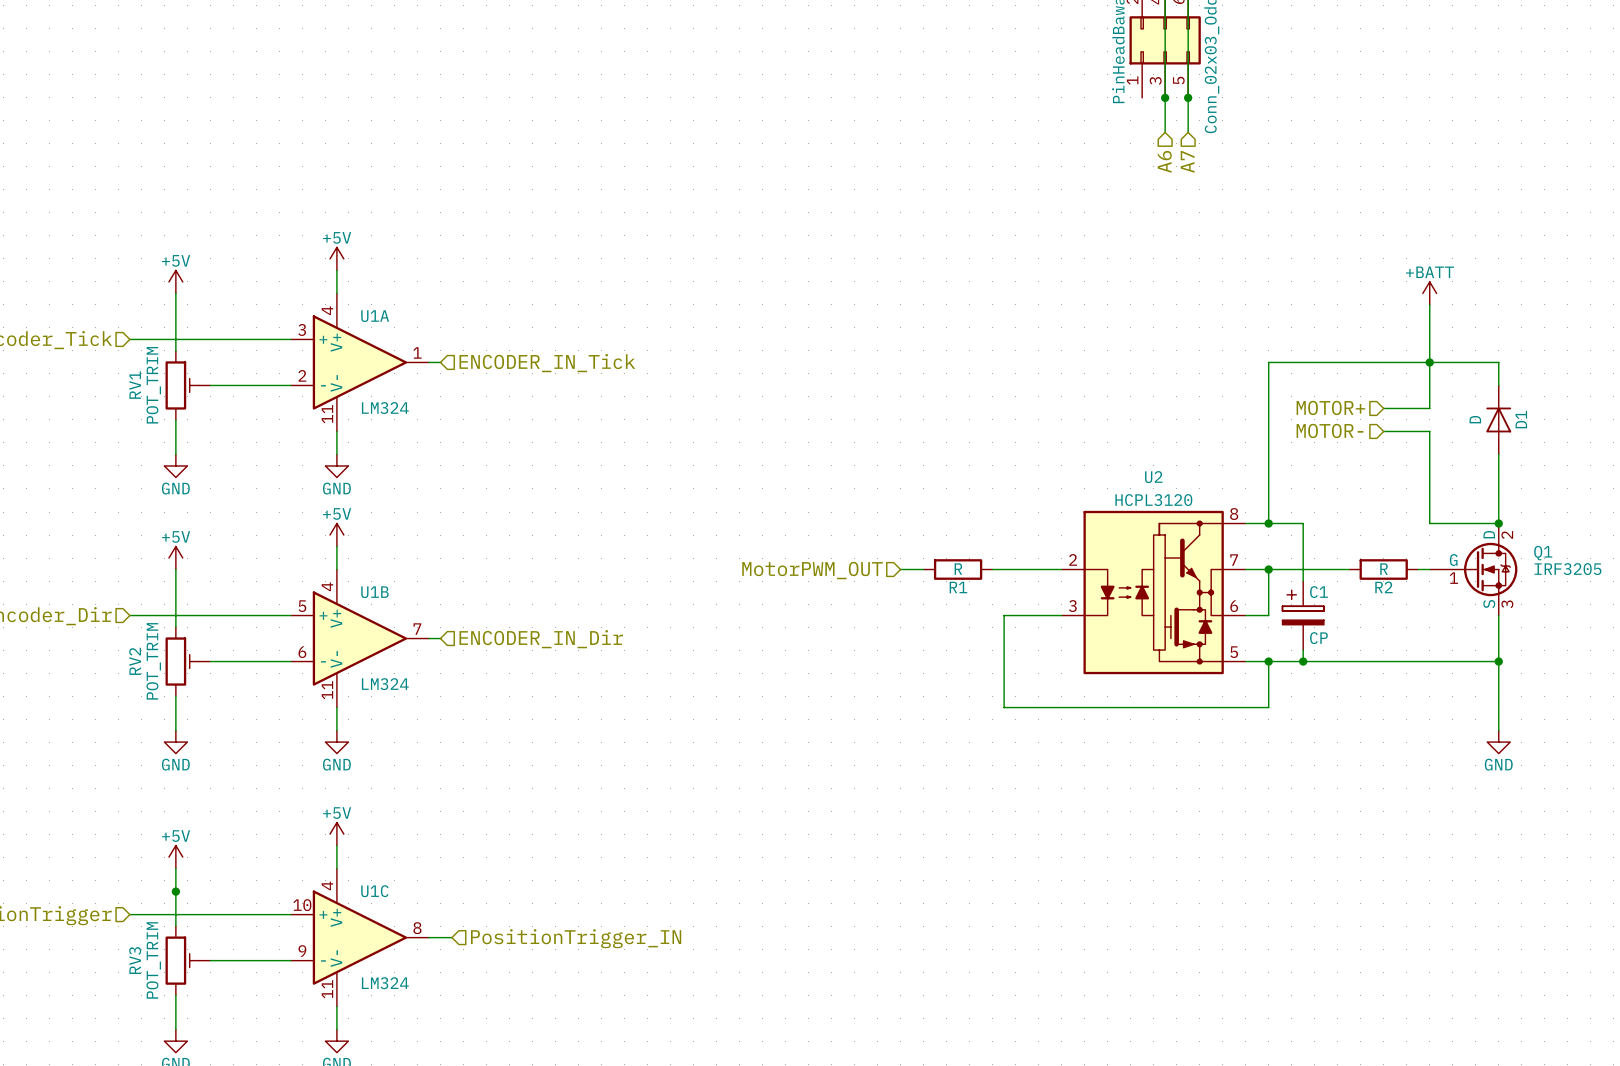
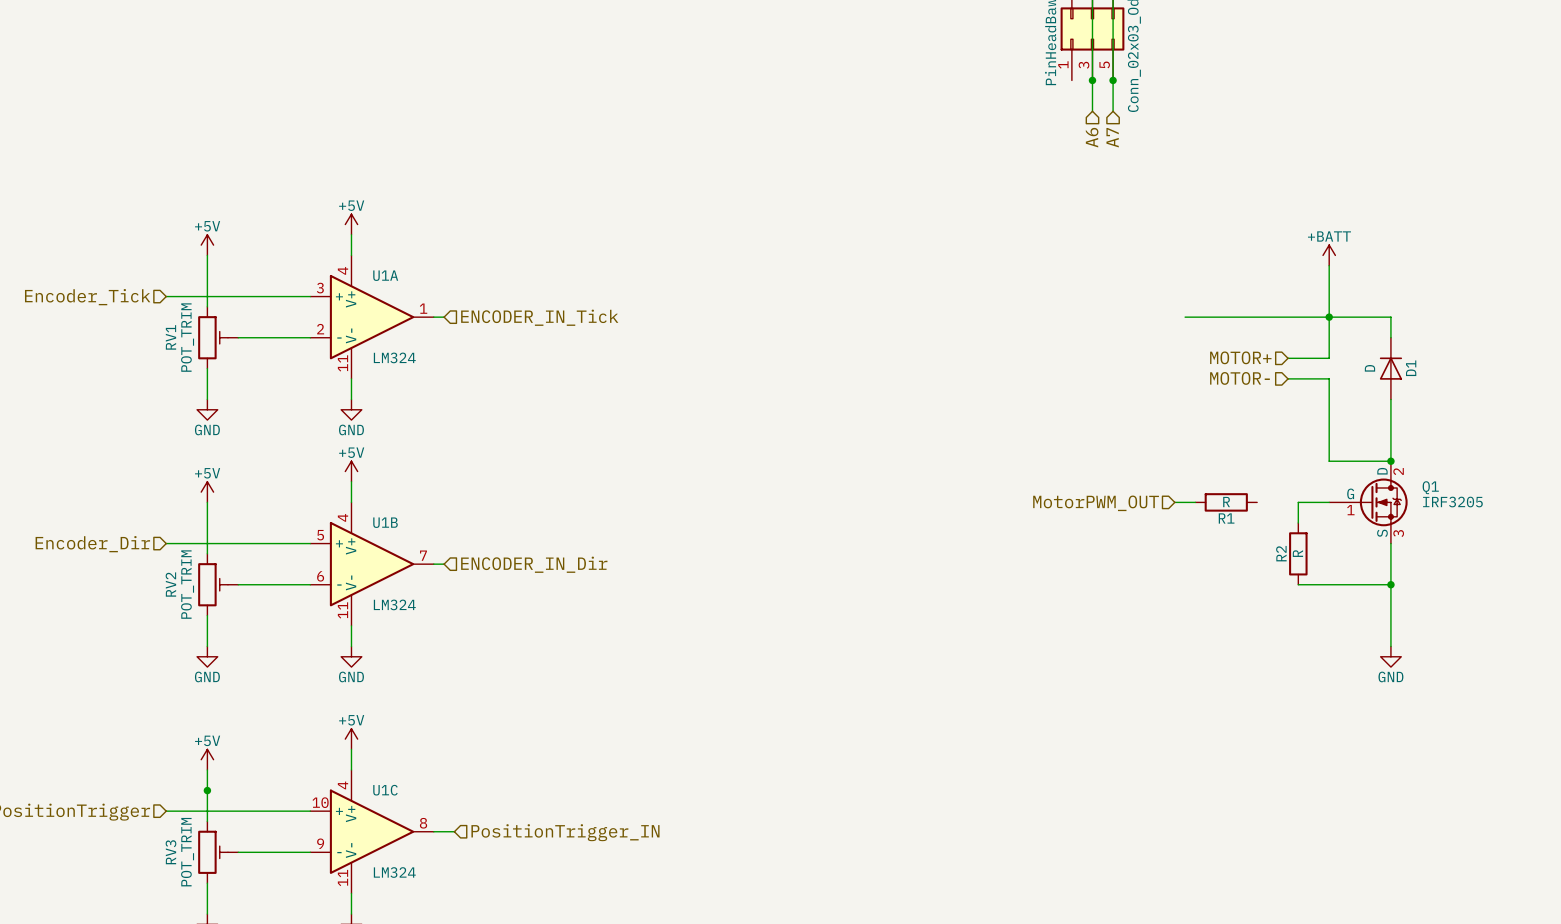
wire: (1268, 362) (1268, 523) -> none
wire: (1245, 523) (1303, 523) (1303, 581) -> none
junction: (1268, 523) -> none
wire: (900, 569) (923, 569) -> none
R1 position: (958, 569) -> (1226, 502)
wire: (992, 569) (1061, 569) -> none
wire: (1245, 569) (1257, 569) -> none
wire: (1268, 569) (1268, 615) (1245, 615) -> none
junction: (1268, 569) -> none
wire: (1280, 569) (1349, 569) -> none
R2 rotation: 0° (1383, 569) -> 90° clockwise (1298, 553)
R2 position: (1383, 569) -> (1298, 553)
wire: none -> (1318, 502) (1298, 502) (1298, 522)
hierarchical label: MotorPWM_OUT (812, 570) -> none
hierarchical label: none -> MotorPWM_OUT (1096, 503)
U2: HCPL3120 (1153, 592) -> none
wire: (1061, 615) (1004, 615) (1004, 707) (1268, 707) (1268, 661) -> none
C1: CP (1303, 615) -> none
wire: (1303, 650) (1303, 661) -> none
wire: (1245, 661) (1395, 661) -> none
junction: (1268, 661) -> none
junction: (1303, 661) -> none

